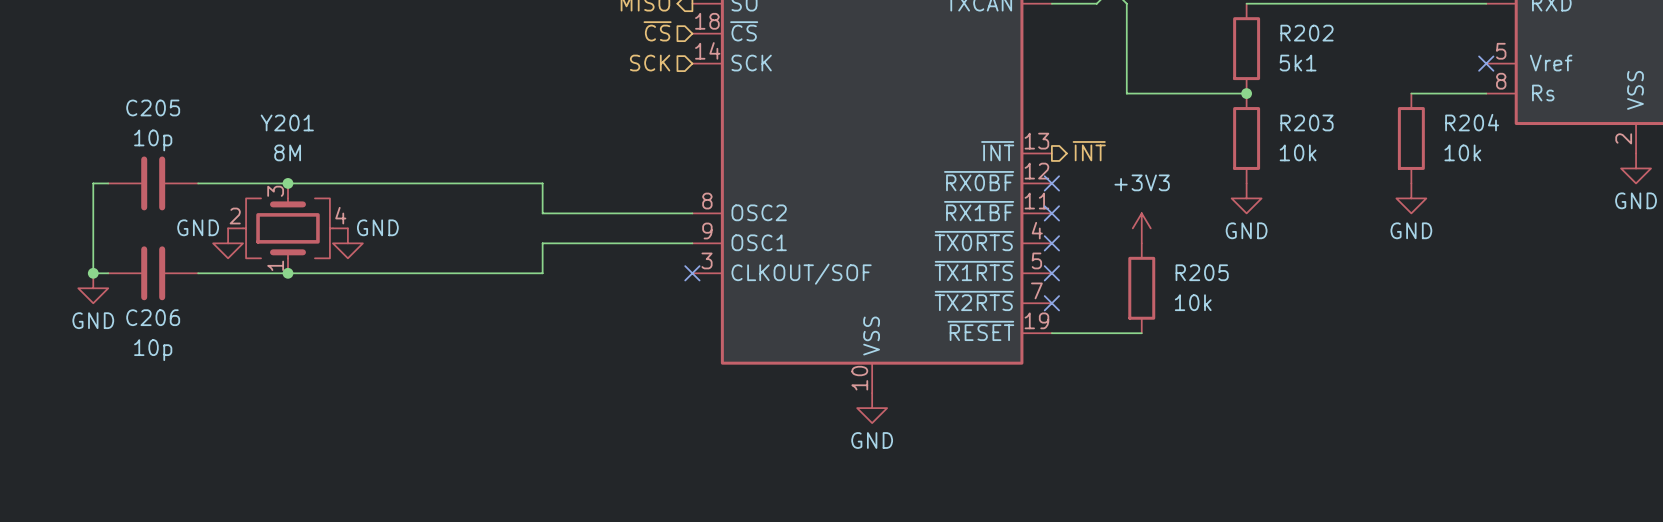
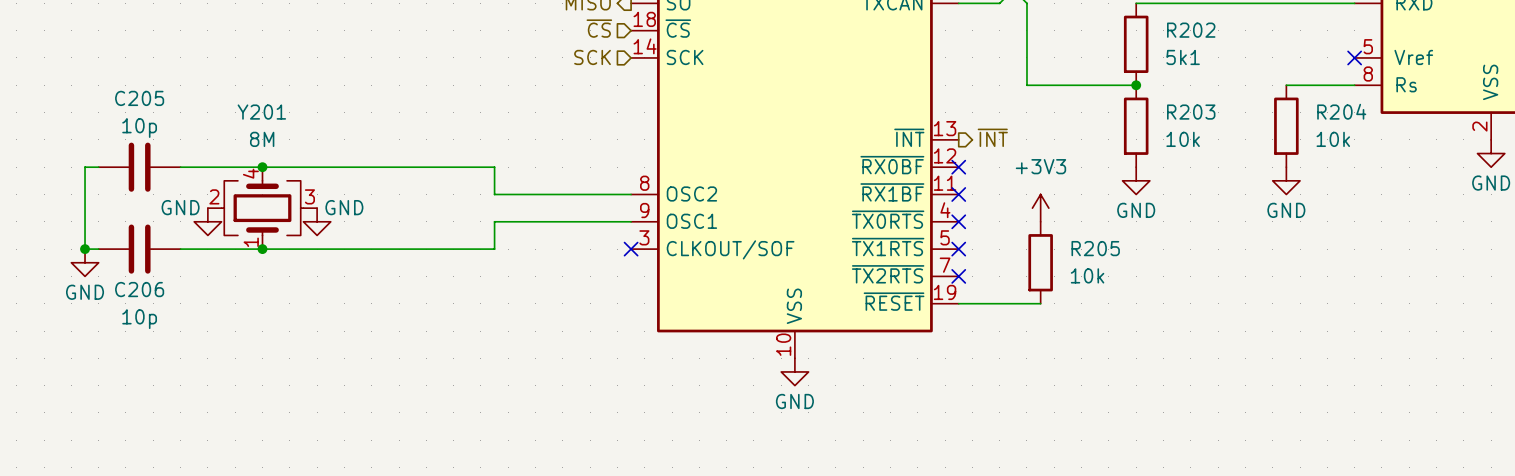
Y201 pin number: 3 (275, 191) -> 4 (250, 173)
Y201 pin number: 4 (340, 215) -> 3 (309, 196)

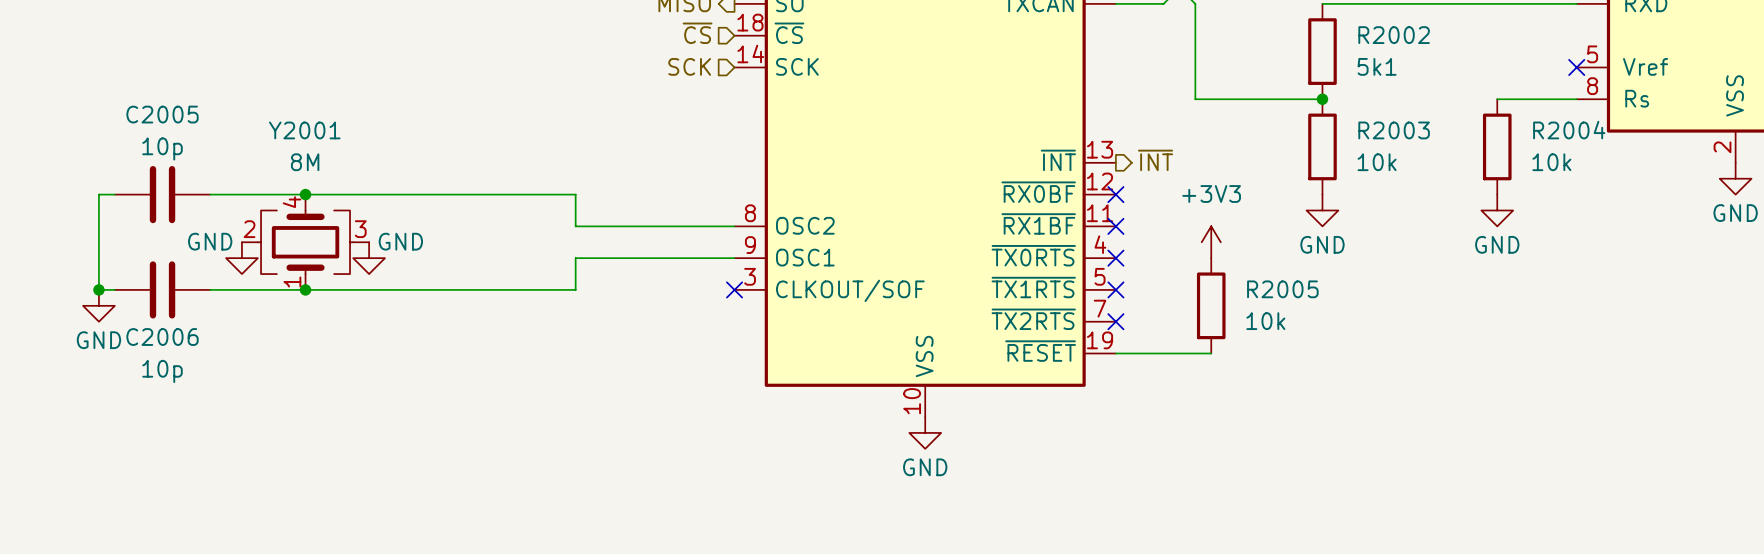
R202 name: R202 (1191, 30) -> R2002 (1394, 35)
C205 name: C205 (139, 98) -> C2005 (162, 114)
R204 name: R204 (1341, 111) -> R2004 (1569, 130)
Y201 name: Y201 (261, 112) -> Y2001 (304, 130)
R203 name: R203 (1191, 112) -> R2003 (1394, 130)
R205 name: R205 (1095, 248) -> R2005 (1282, 289)
C206 name: C206 (139, 289) -> C2006 (162, 337)

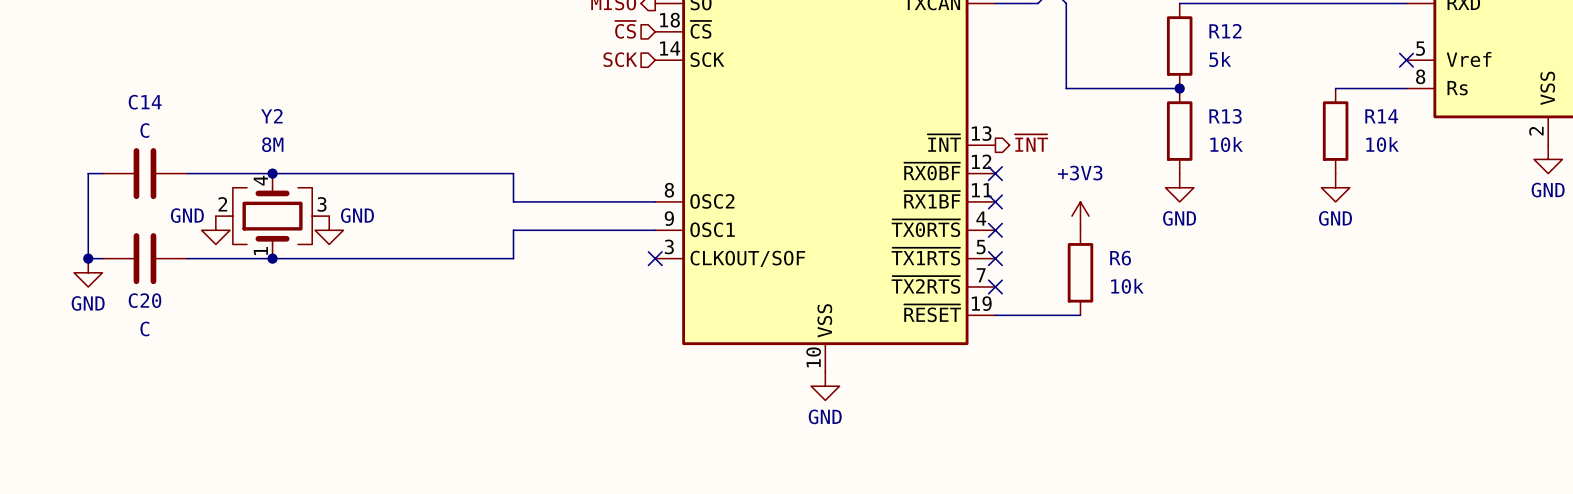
R2002 name: R2002 (1394, 35) -> R12 (1225, 31)
R2002 value: 5k1 (1377, 66) -> 5k (1220, 59)
C2005 name: C2005 (162, 114) -> C14 (145, 102)
Y2001 name: Y2001 (304, 130) -> Y2 (271, 116)
R2003 name: R2003 (1394, 130) -> R13 (1225, 116)
R2004 name: R2004 (1569, 130) -> R14 (1381, 116)
C2005 value: 10p (162, 148) -> C (144, 130)
R2005 name: R2005 (1282, 289) -> R6 (1120, 258)
C2006 name: C2006 (162, 337) -> C20 (145, 300)
C2006 value: 10p (162, 371) -> C (144, 328)

